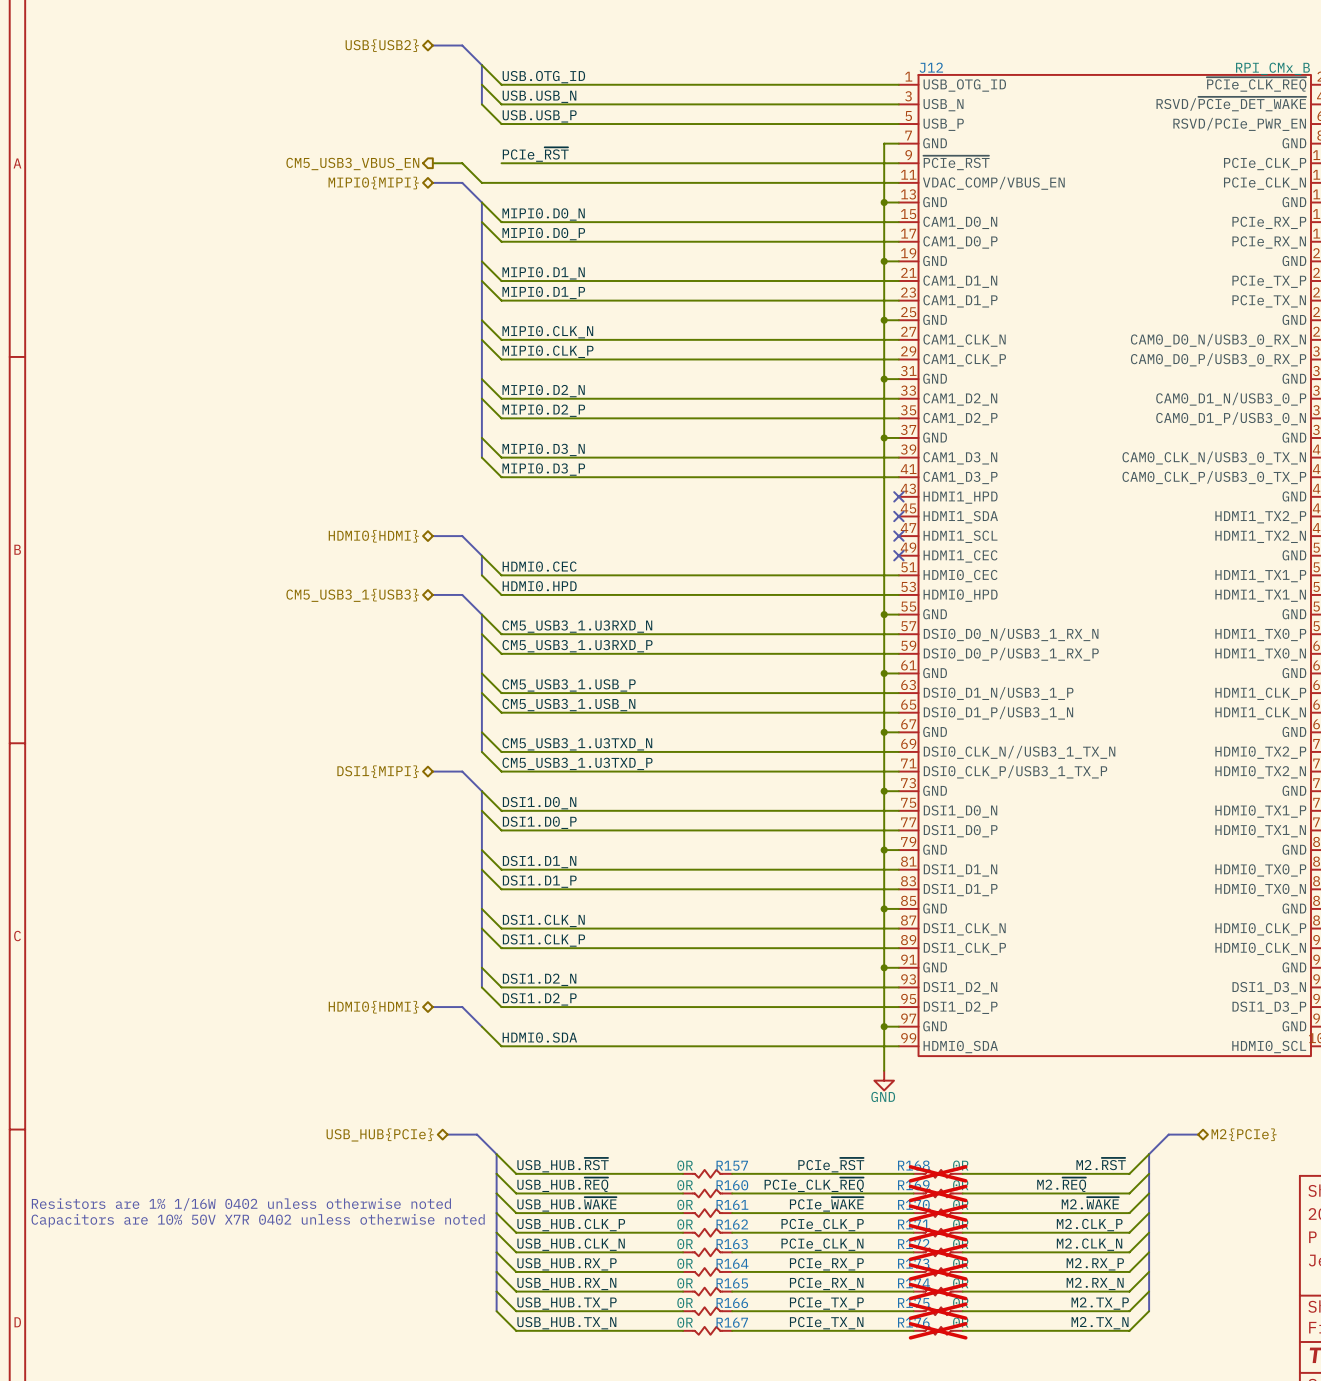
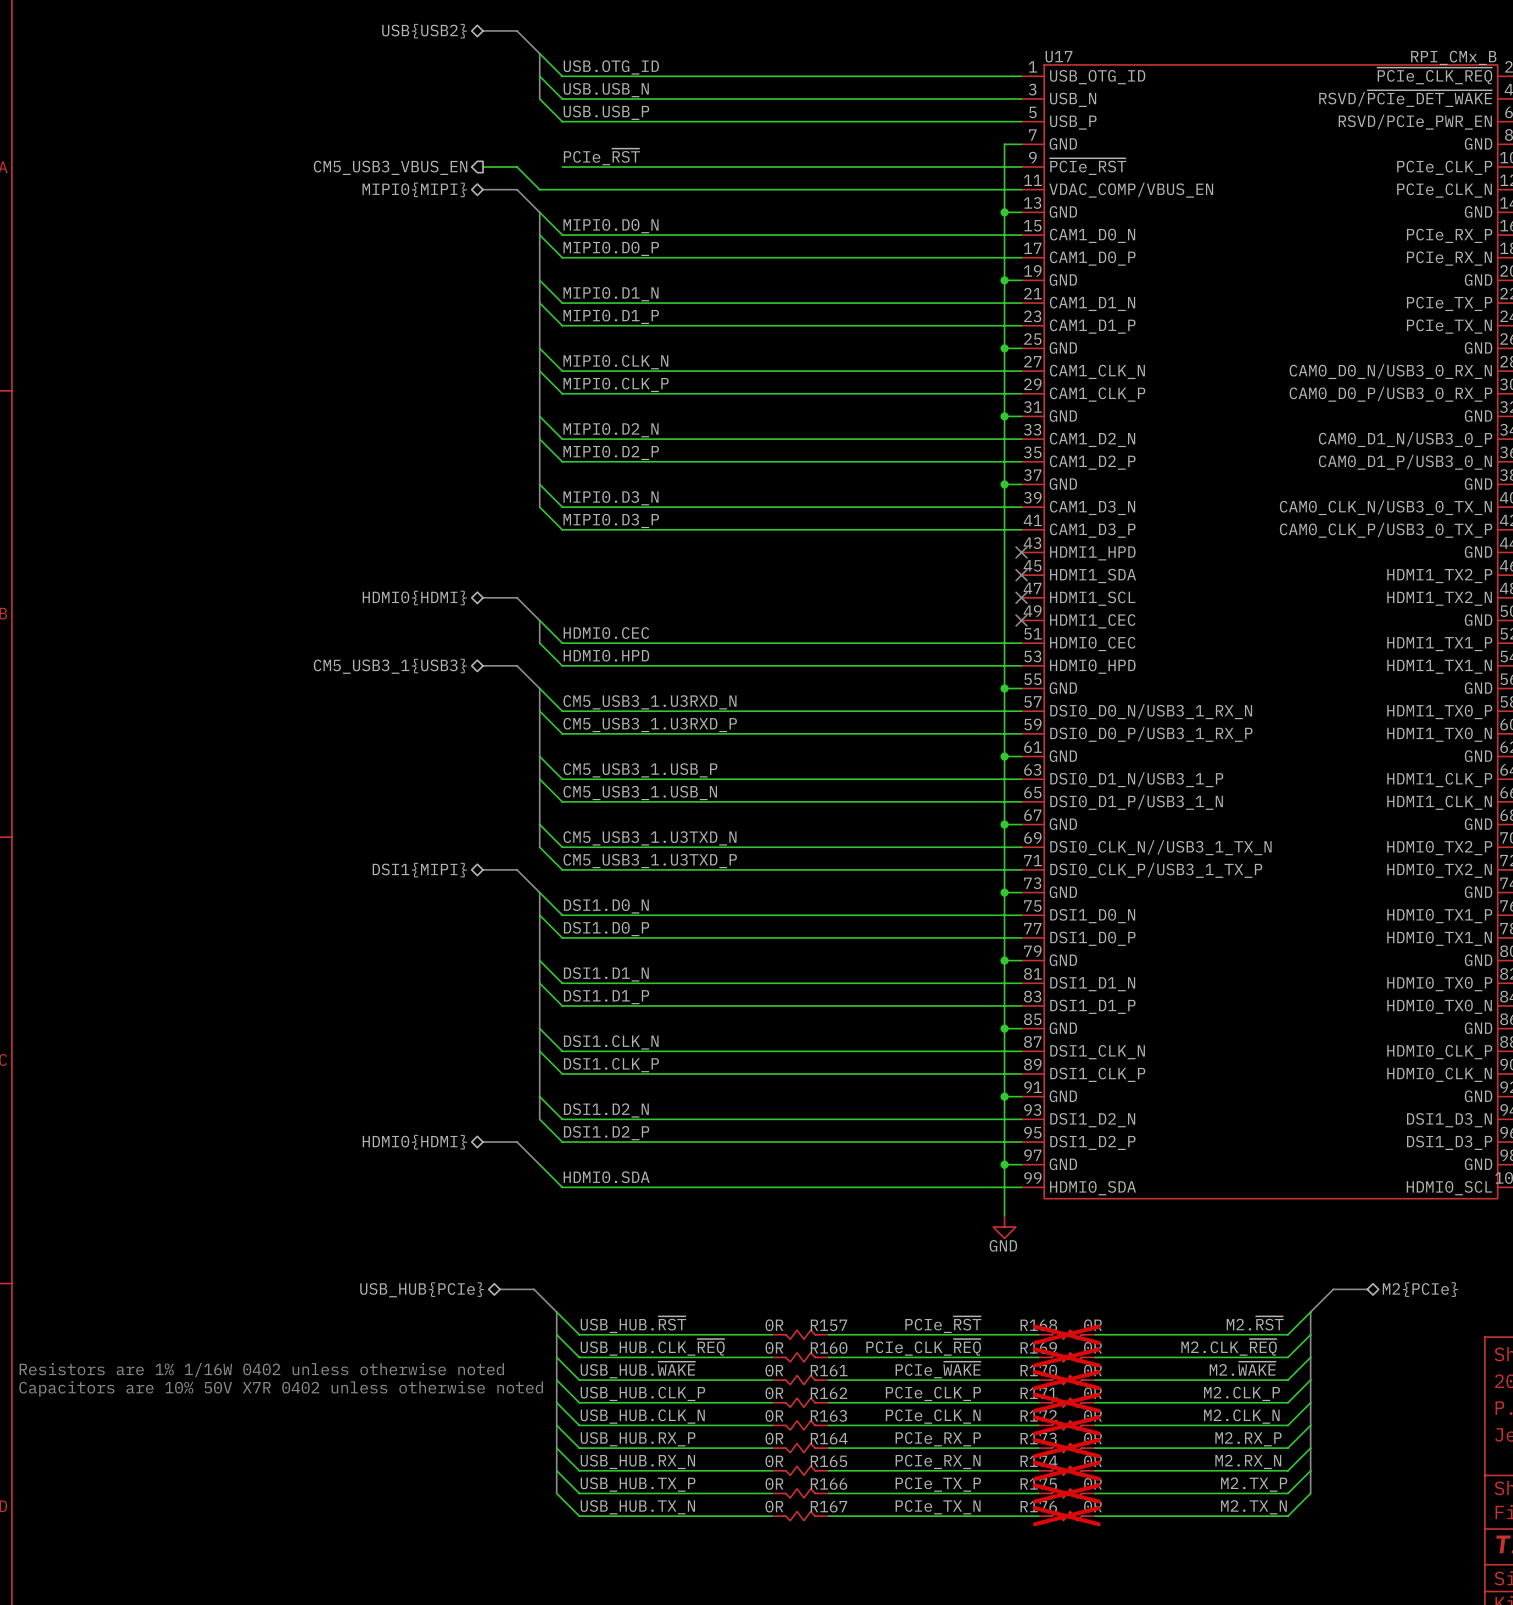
J12 name: J12 (931, 67) -> U17 (1059, 56)
label: USB_HUB.~{REQ} (562, 1184) -> USB_HUB.CLK_~{REQ} (652, 1347)
label: M2.~{REQ} (1061, 1184) -> M2.CLK_~{REQ} (1229, 1347)

